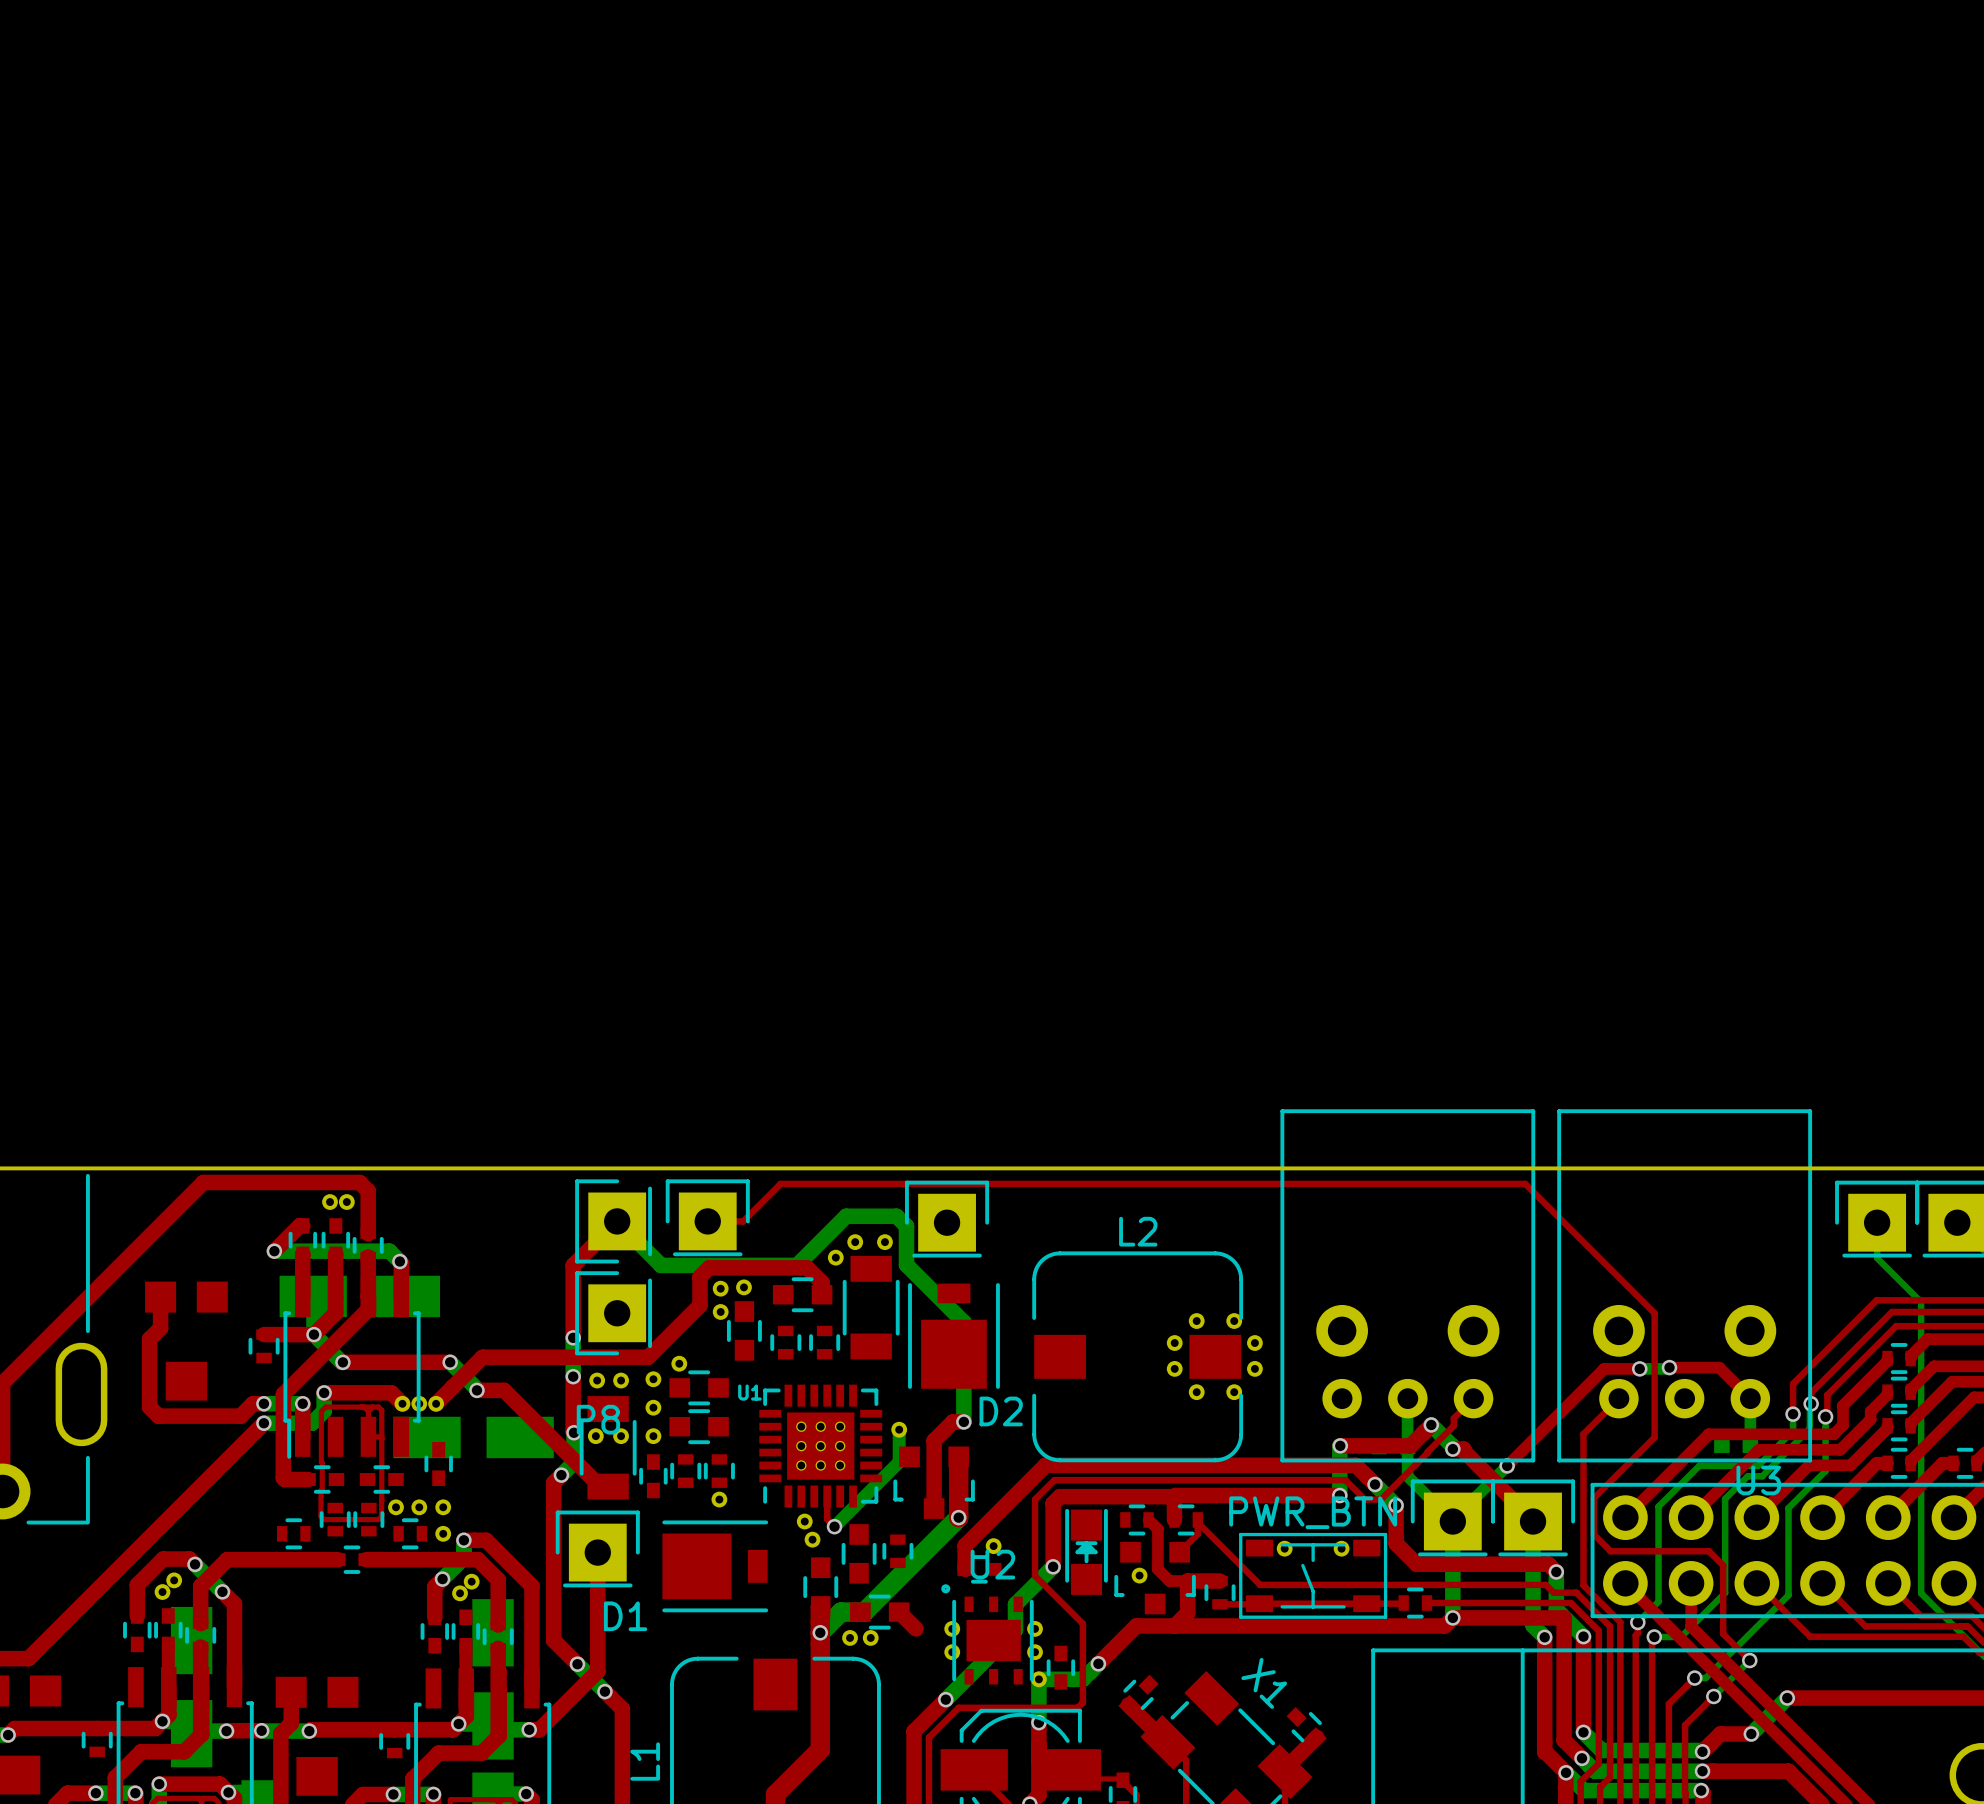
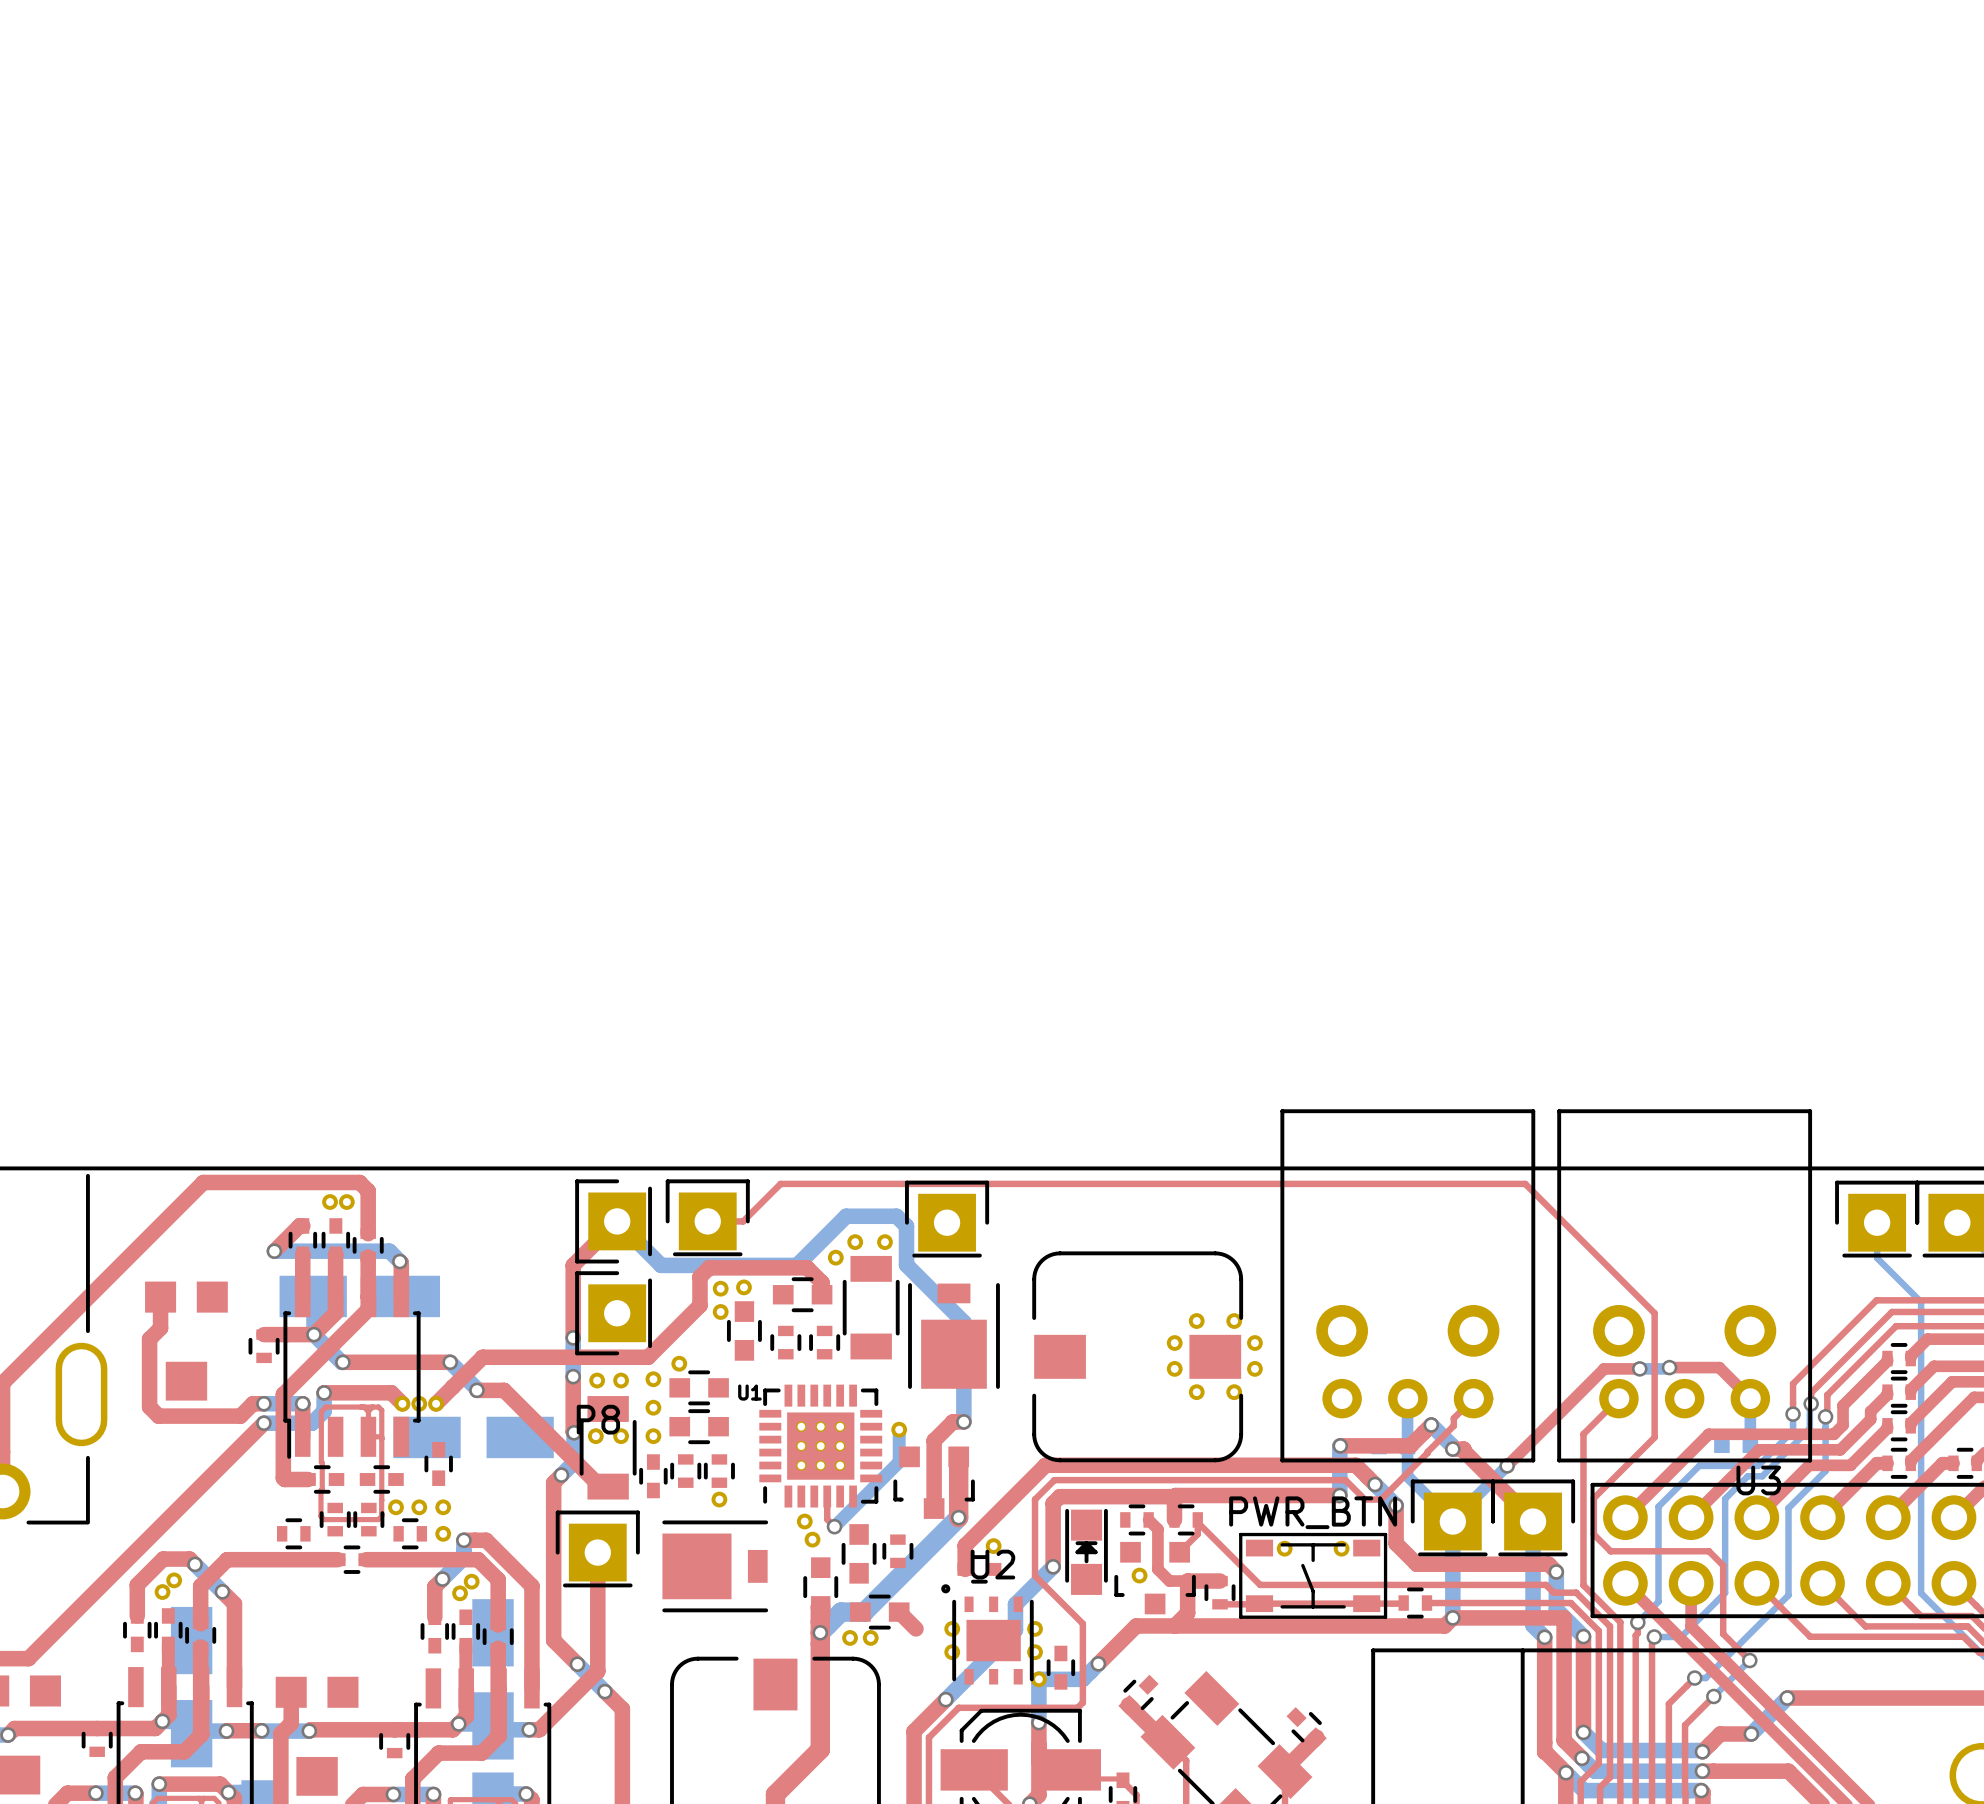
L2 name: L2 (1138, 1231) -> none
D2 name: D2 (1001, 1411) -> none
D1 name: D1 (625, 1616) -> none
X1 name: X1 (1264, 1683) -> none
L1 name: L1 (645, 1761) -> none

